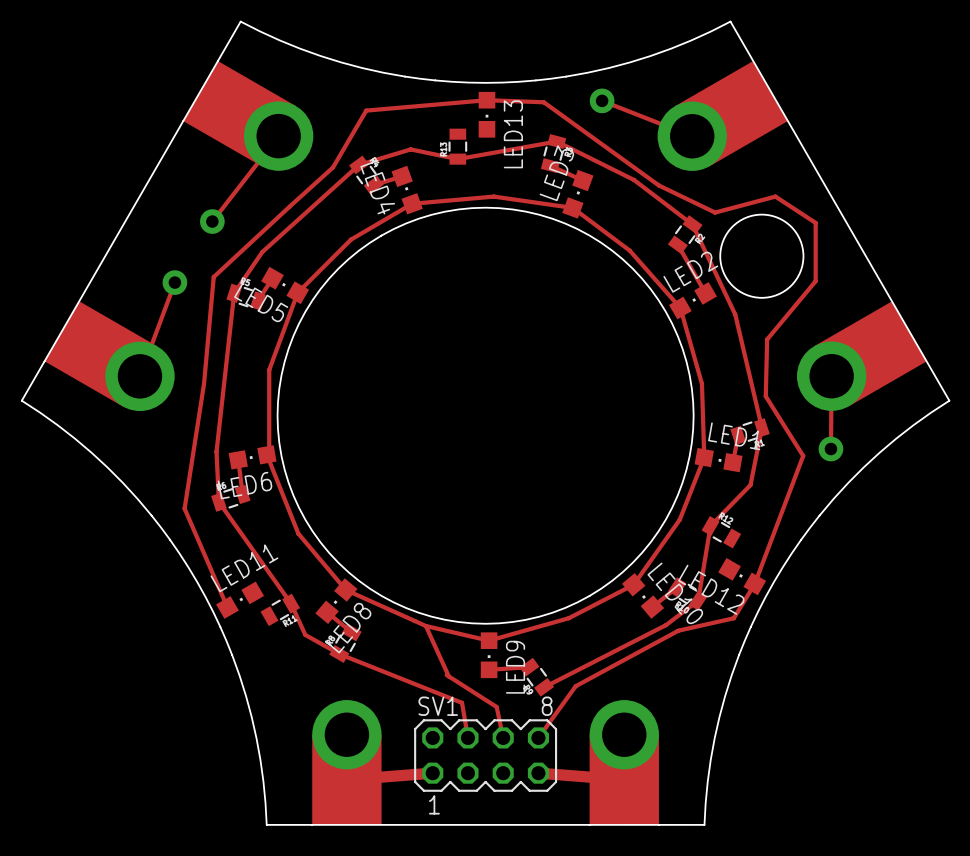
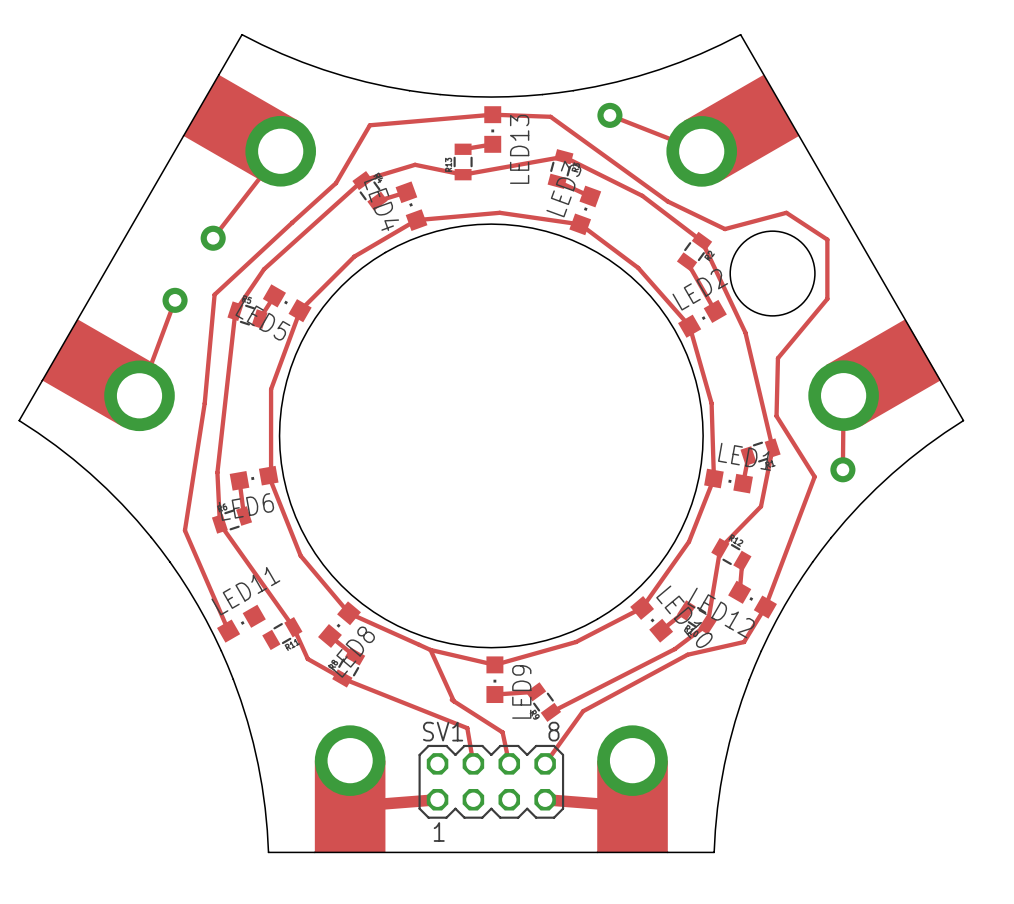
track: none -> (492, 144) (463, 149)
track: none -> (742, 560) (739, 592)

